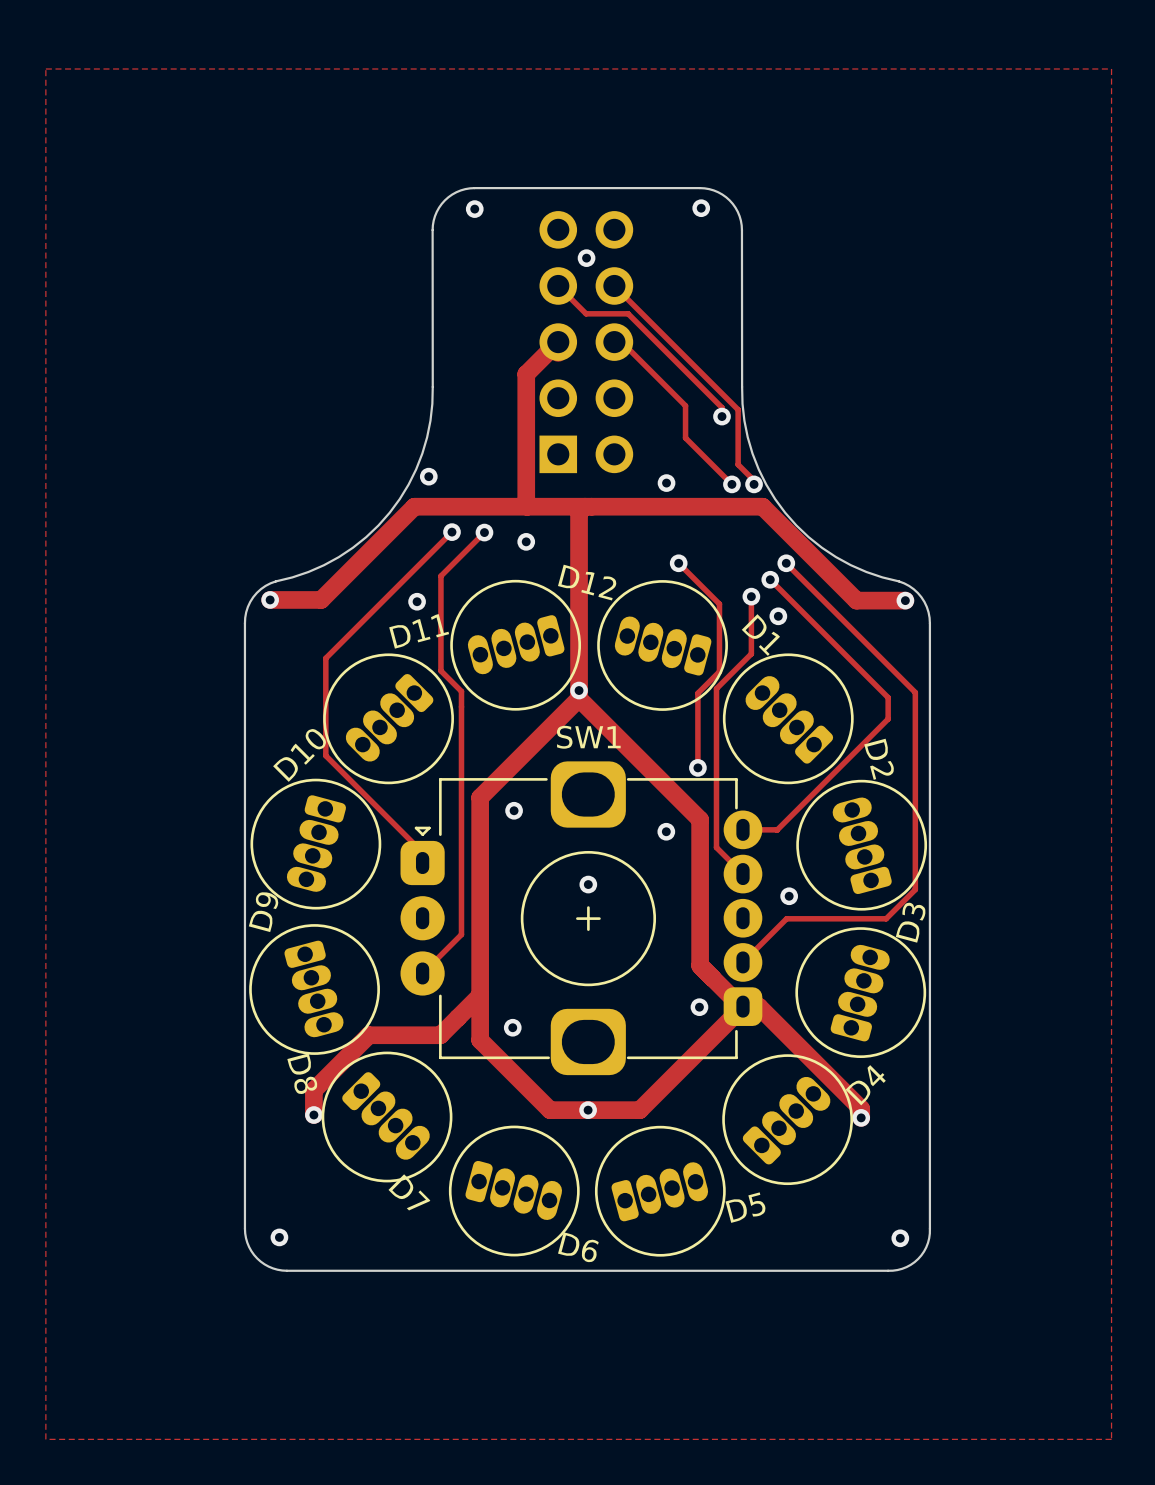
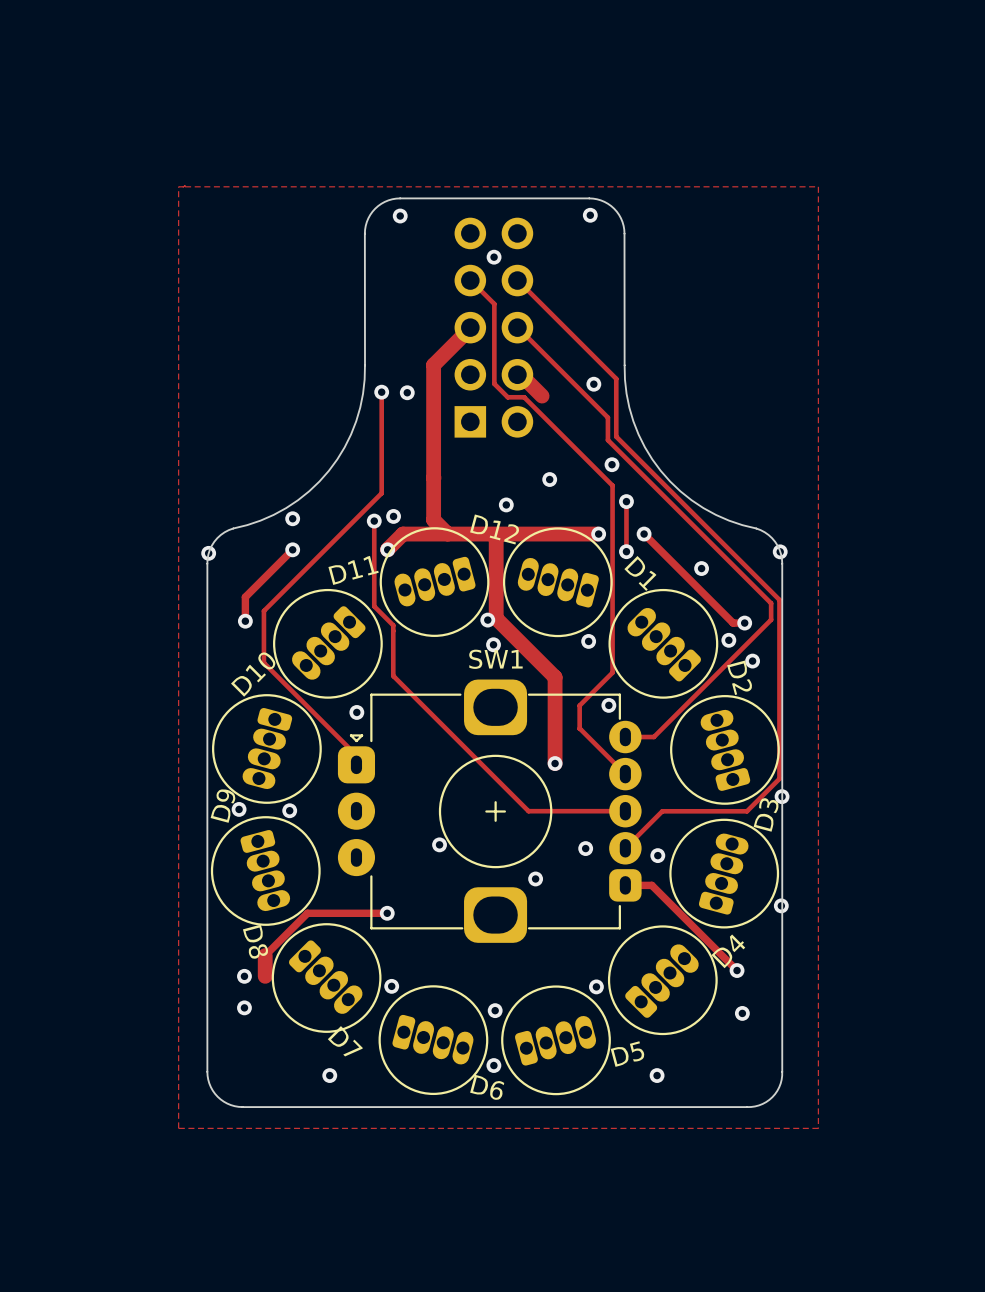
zone outline: (45, 69) (45, 1439) (1111, 1439) (1111, 69) (45, 69) -> (185, 185) (178, 186) (178, 1128) (818, 1128) (818, 186) (185, 185)
track: (558, 285) (586, 313) (628, 313) (722, 407) (722, 416) -> (470, 280) (494, 304) (494, 383) (507, 397) (524, 397) (612, 485) (612, 672) (579, 705) (579, 728)
track: (614, 285) (738, 409) (738, 464) (754, 480) (754, 484) -> none
track: none -> (470, 327) (433, 365) (433, 519) (447, 534)
track: (614, 342) (621, 342) (685, 405) (685, 437) (731, 484) -> none
track: (558, 352) (558, 342) (526, 374) (527, 506) -> none
track: none -> (520, 374) (542, 396)
via position: (722, 416) -> (593, 384)
via: none -> (381, 392)
via: none -> (407, 392)
via: (428, 476) -> none
via: (666, 483) -> none
via: (731, 484) -> none
via: (754, 484) -> none
via: none -> (612, 464)
track: (585, 506) (579, 512) (579, 698) -> none
via: none -> (549, 479)
track: (451, 532) (325, 658) (325, 755) (422, 852) -> (381, 392) (381, 493) (263, 611) (263, 662) (356, 755)
via: (451, 532) -> none
track: (484, 532) (440, 576) (440, 670) (461, 691) (461, 934) (422, 973) -> none
via: (484, 532) -> none
via: (526, 541) -> none
track: none -> (626, 501) (626, 551)
via: none -> (626, 501)
via: none -> (506, 504)
track: (678, 563) (719, 604) (719, 671) (697, 693) (697, 767) -> none
via: (678, 563) -> none
track: (786, 563) (915, 692) (915, 889) (886, 918) (786, 918) -> (518, 280) (616, 378) (616, 436) (779, 599) (779, 778) (747, 811) (661, 811)
via: (786, 563) -> none
via: none -> (393, 516)
via: none -> (292, 518)
track: none -> (374, 521) (374, 606) (393, 625) (393, 675) (528, 811) (625, 811)
via: none -> (374, 521)
track: (770, 579) (888, 697) (888, 719) (776, 829) -> (518, 327) (607, 417) (607, 440) (771, 603) (771, 619) (653, 737)
via: (770, 579) -> none
track: none -> (597, 534) (403, 534) (387, 549)
via: none -> (598, 534)
track: none -> (644, 534) (733, 623) (744, 622)
via: none -> (644, 534)
track: none -> (496, 540) (496, 618)
track: (751, 596) (751, 653) (716, 688) (716, 847) -> (580, 728) (603, 751)
via: (751, 596) -> none
track: (270, 599) (321, 599) (414, 506) (762, 506) (856, 600) (905, 600) -> none
via position: (270, 599) -> (208, 553)
via position: (905, 600) -> (780, 551)
via: (417, 601) -> none
track: none -> (292, 549) (245, 597) (245, 621)
via: none -> (292, 549)
via: none -> (387, 549)
via: none -> (626, 551)
via: (778, 616) -> none
via: none -> (701, 568)
track: none -> (496, 618) (555, 677) (555, 763)
via: none -> (245, 621)
via: none -> (744, 623)
track: (579, 698) (480, 797) (480, 1040) (550, 1110) (639, 1110) (742, 1006) -> none
track: (579, 698) (700, 819) (700, 965) (742, 1006) -> none
via: none -> (728, 640)
via: none -> (588, 641)
via: none -> (493, 644)
via: none -> (752, 661)
via: (697, 767) -> none
via: none -> (608, 705)
via: none -> (356, 712)
via: (514, 810) -> none
via position: (666, 831) -> (555, 763)
via: (588, 884) -> none
via: (789, 896) -> none
via: none -> (782, 796)
via: none -> (239, 809)
via: none -> (289, 810)
via: none -> (439, 844)
via: none -> (585, 848)
via: none -> (657, 855)
track: (480, 995) (440, 1035) (368, 1035) (364, 1039) -> (387, 913) (307, 913)
via: none -> (535, 878)
track: (758, 1006) (861, 1108) (861, 1117) -> (638, 885) (651, 885) (737, 970)
via: (699, 1007) -> none
via: (512, 1027) -> none
via: none -> (781, 905)
track width: thick (364, 1039) (313, 1090) -> thin (307, 913) (265, 955)
via: none -> (387, 913)
via position: (588, 1110) -> (495, 1010)
via: none -> (244, 976)
via: (313, 1115) -> none
via position: (861, 1117) -> (737, 970)
via: none -> (391, 986)
via: none -> (596, 986)
via: none -> (244, 1007)
via: none -> (742, 1013)
via: none -> (493, 1065)
via: none -> (329, 1075)
via: none -> (657, 1075)
via: (279, 1237) -> none
via: (900, 1238) -> none

